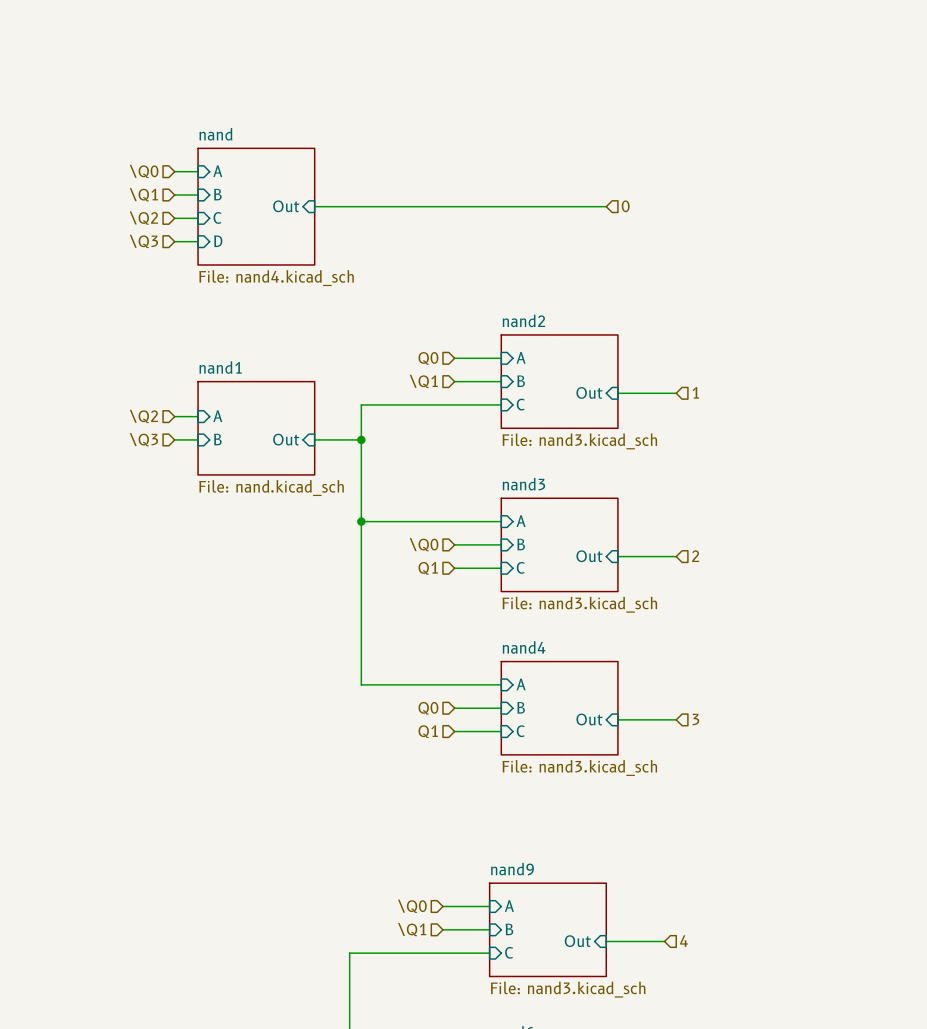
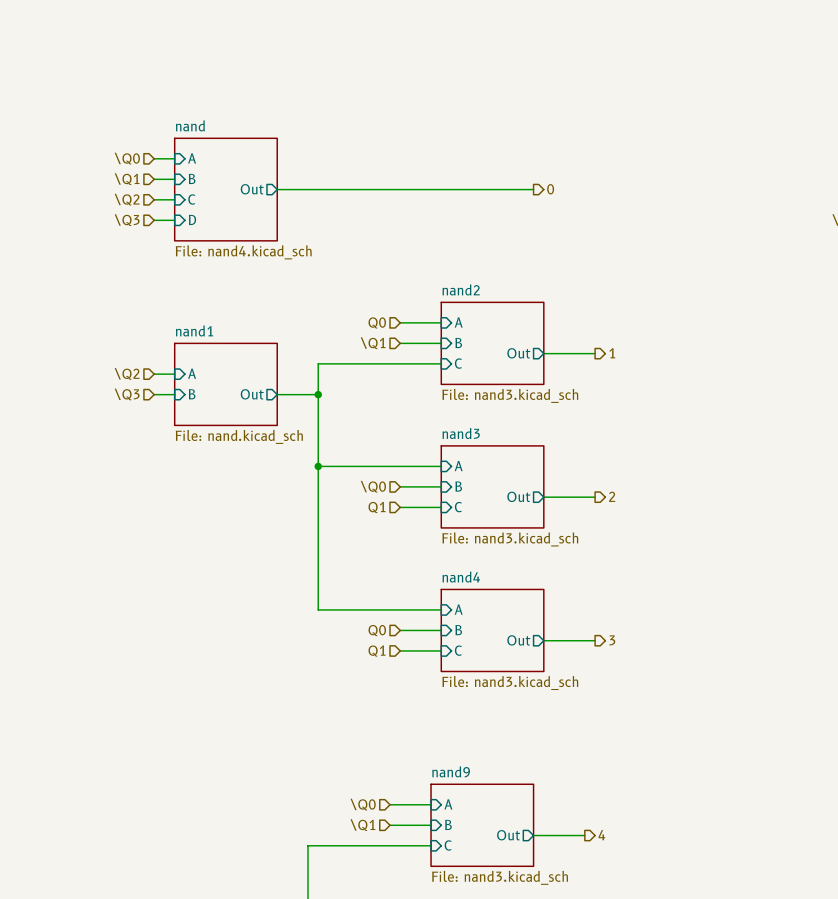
sheet pin shape: input (286, 206) -> output (252, 189)
hierarchical label shape: input (625, 206) -> output (550, 189)
sheet pin shape: input (589, 392) -> output (518, 353)
hierarchical label shape: input (695, 392) -> output (612, 353)
sheet pin shape: input (286, 439) -> output (252, 394)
sheet pin shape: input (589, 556) -> output (518, 496)
hierarchical label shape: input (695, 556) -> output (612, 496)
sheet pin shape: input (589, 719) -> output (518, 640)
hierarchical label shape: input (695, 719) -> output (612, 640)
sheet pin shape: input (577, 941) -> output (508, 835)
hierarchical label shape: input (684, 941) -> output (601, 835)

